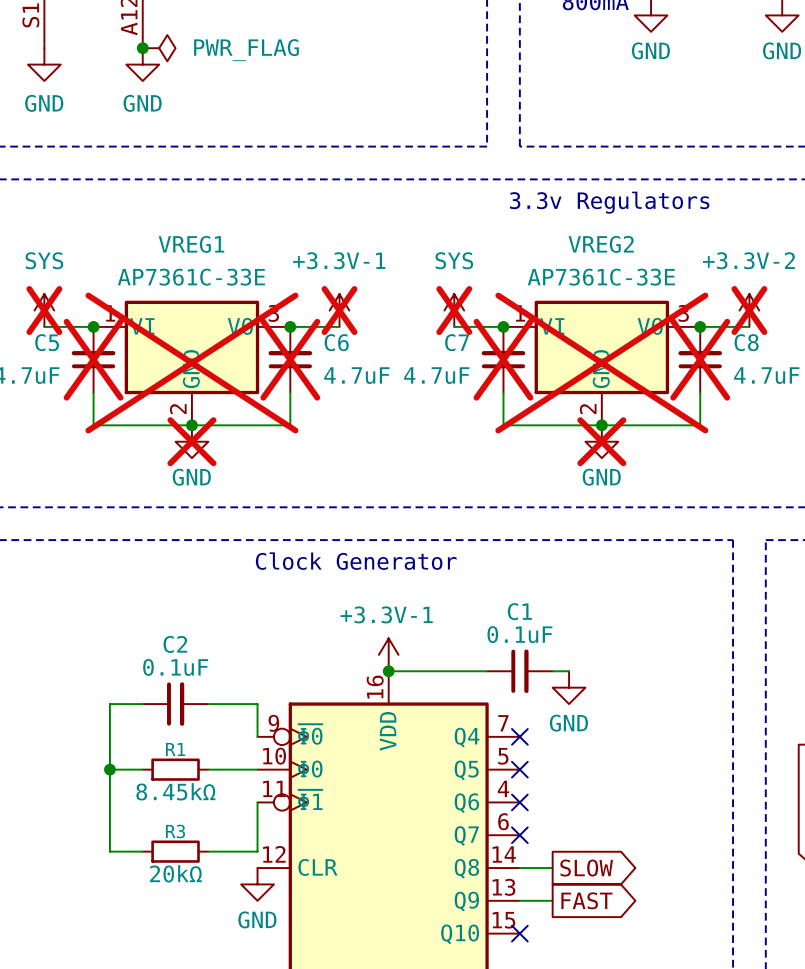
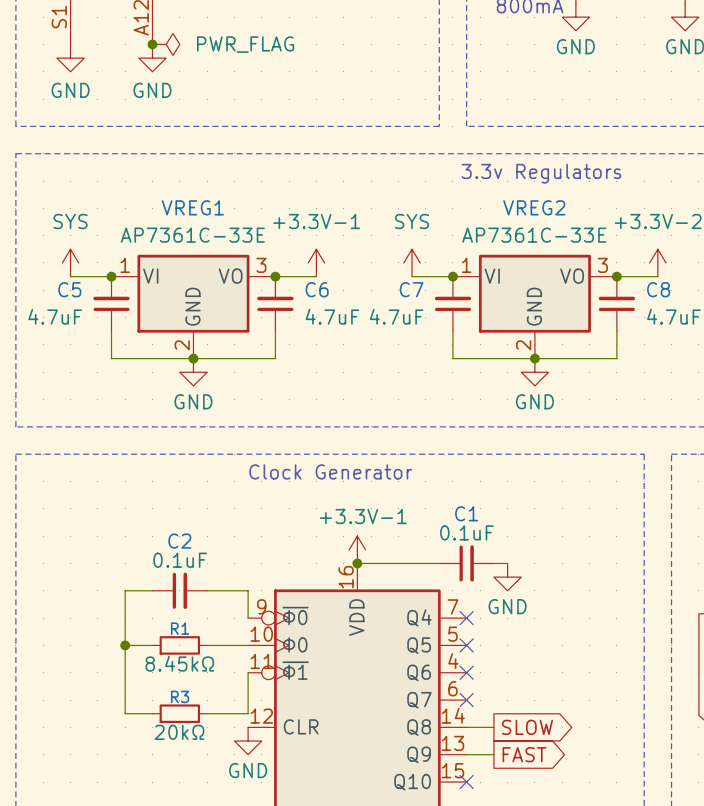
power symbol do-not-place cross: (44, 310) -> none
power symbol do-not-place cross: (339, 310) -> none
power symbol do-not-place cross: (454, 310) -> none
power symbol do-not-place cross: (749, 310) -> none
C5 do-not-place cross: (93, 359) -> none
C6 do-not-place cross: (290, 359) -> none
C7 do-not-place cross: (503, 359) -> none
C8 do-not-place cross: (700, 359) -> none
VREG1 do-not-place cross: (191, 363) -> none
VREG2 do-not-place cross: (601, 363) -> none
power symbol do-not-place cross: (191, 441) -> none
power symbol do-not-place cross: (601, 441) -> none

